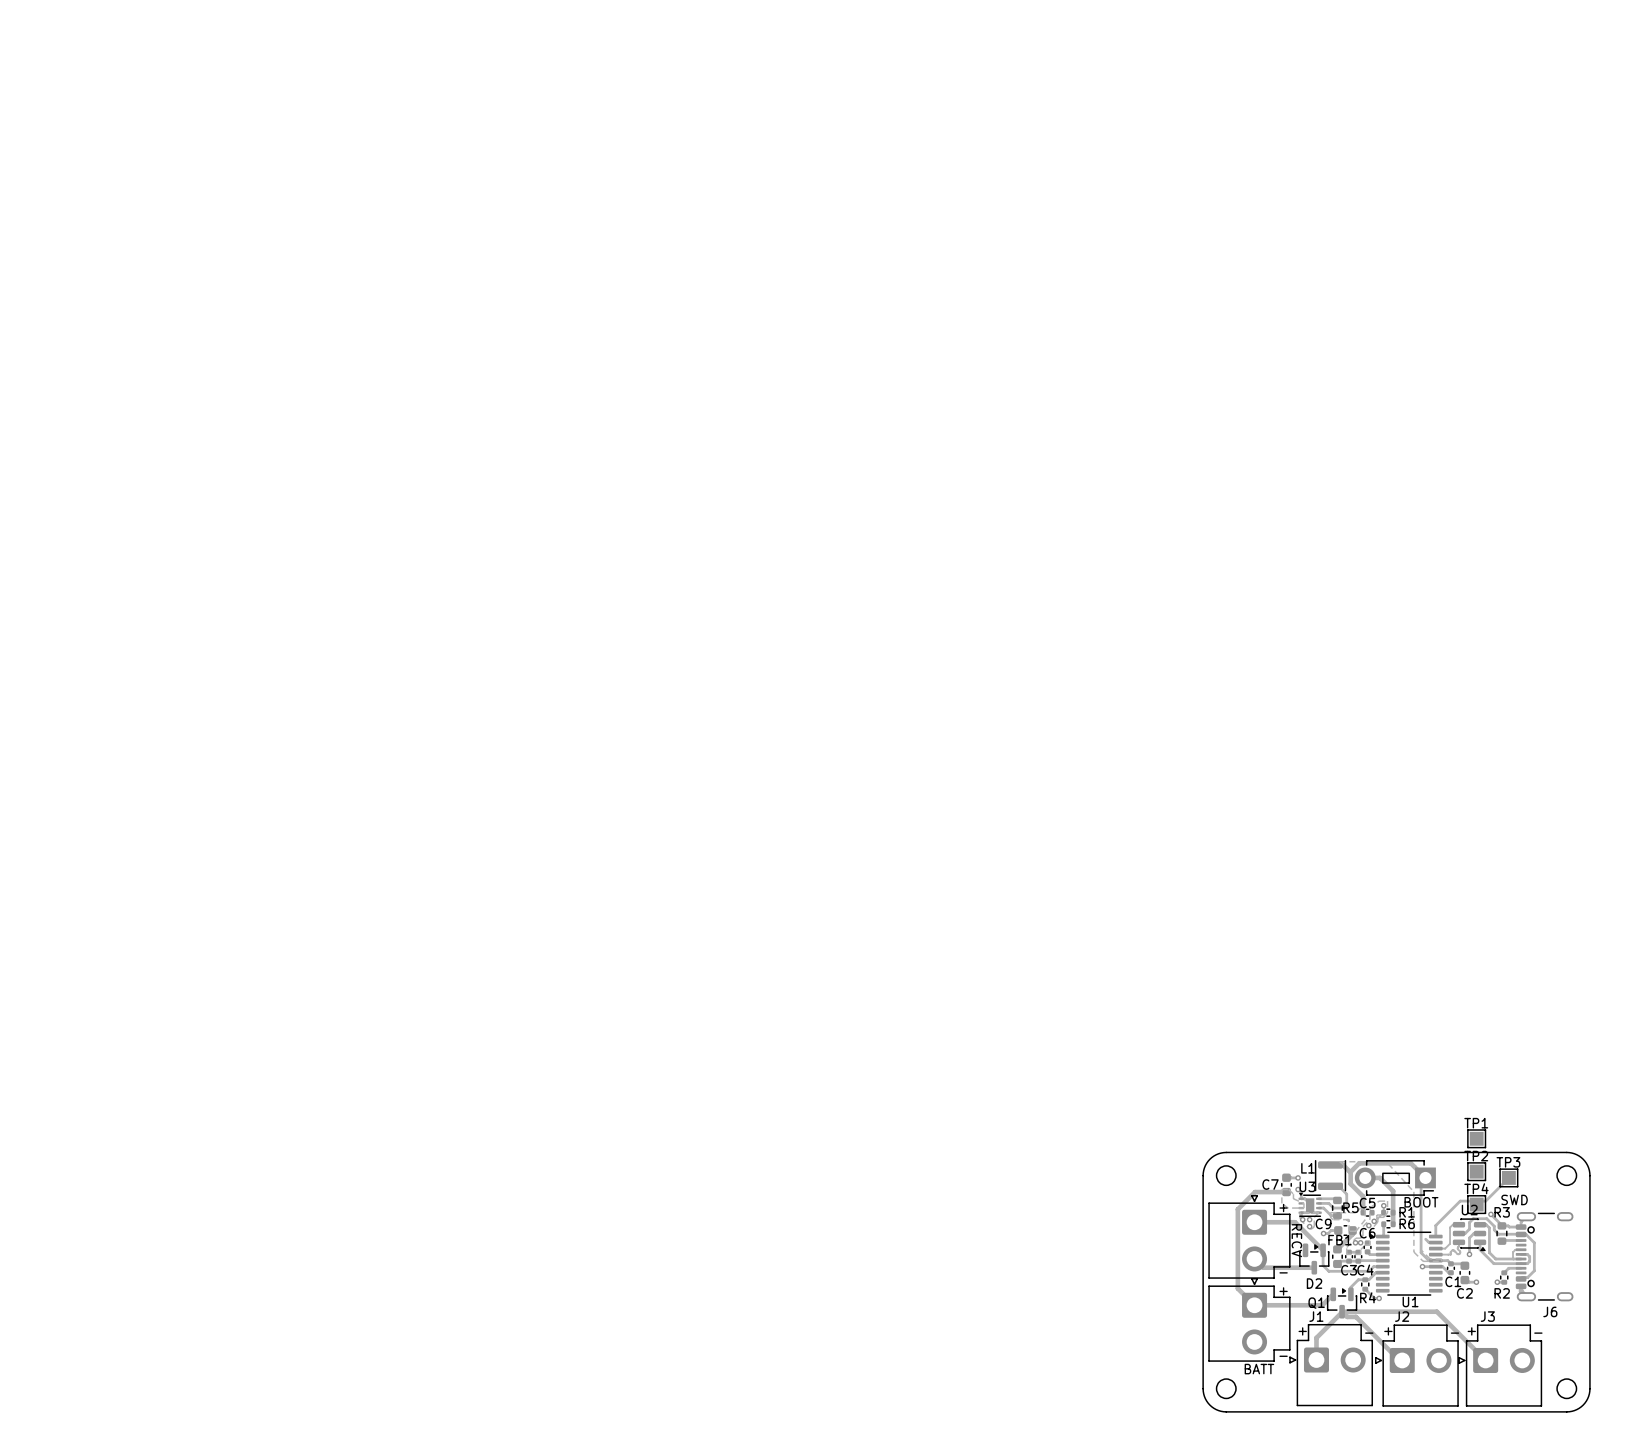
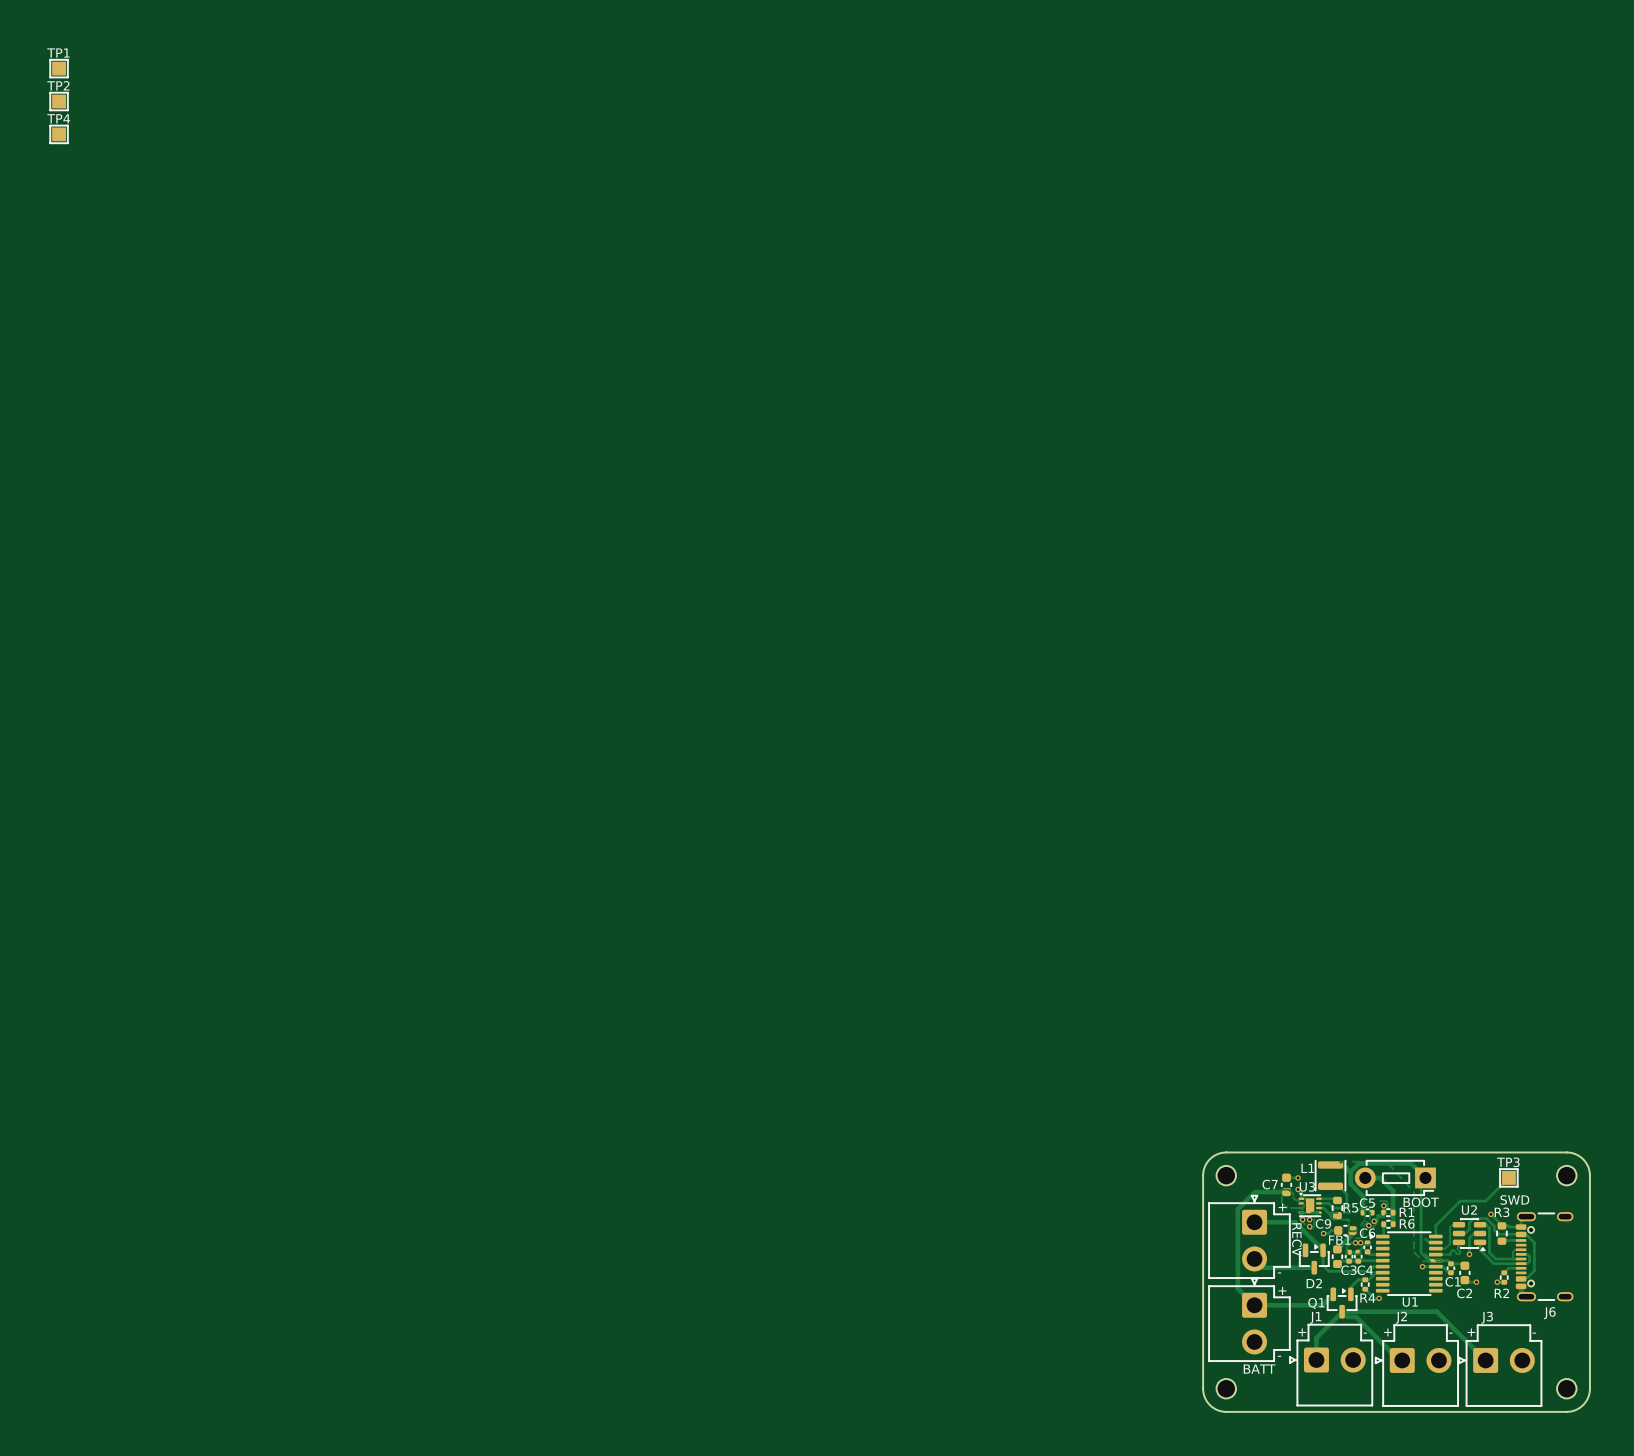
TP1 position: (1476, 1138) -> (59, 68)
TP2 position: (1476, 1171) -> (59, 101)
TP4 position: (1476, 1204) -> (59, 134)

